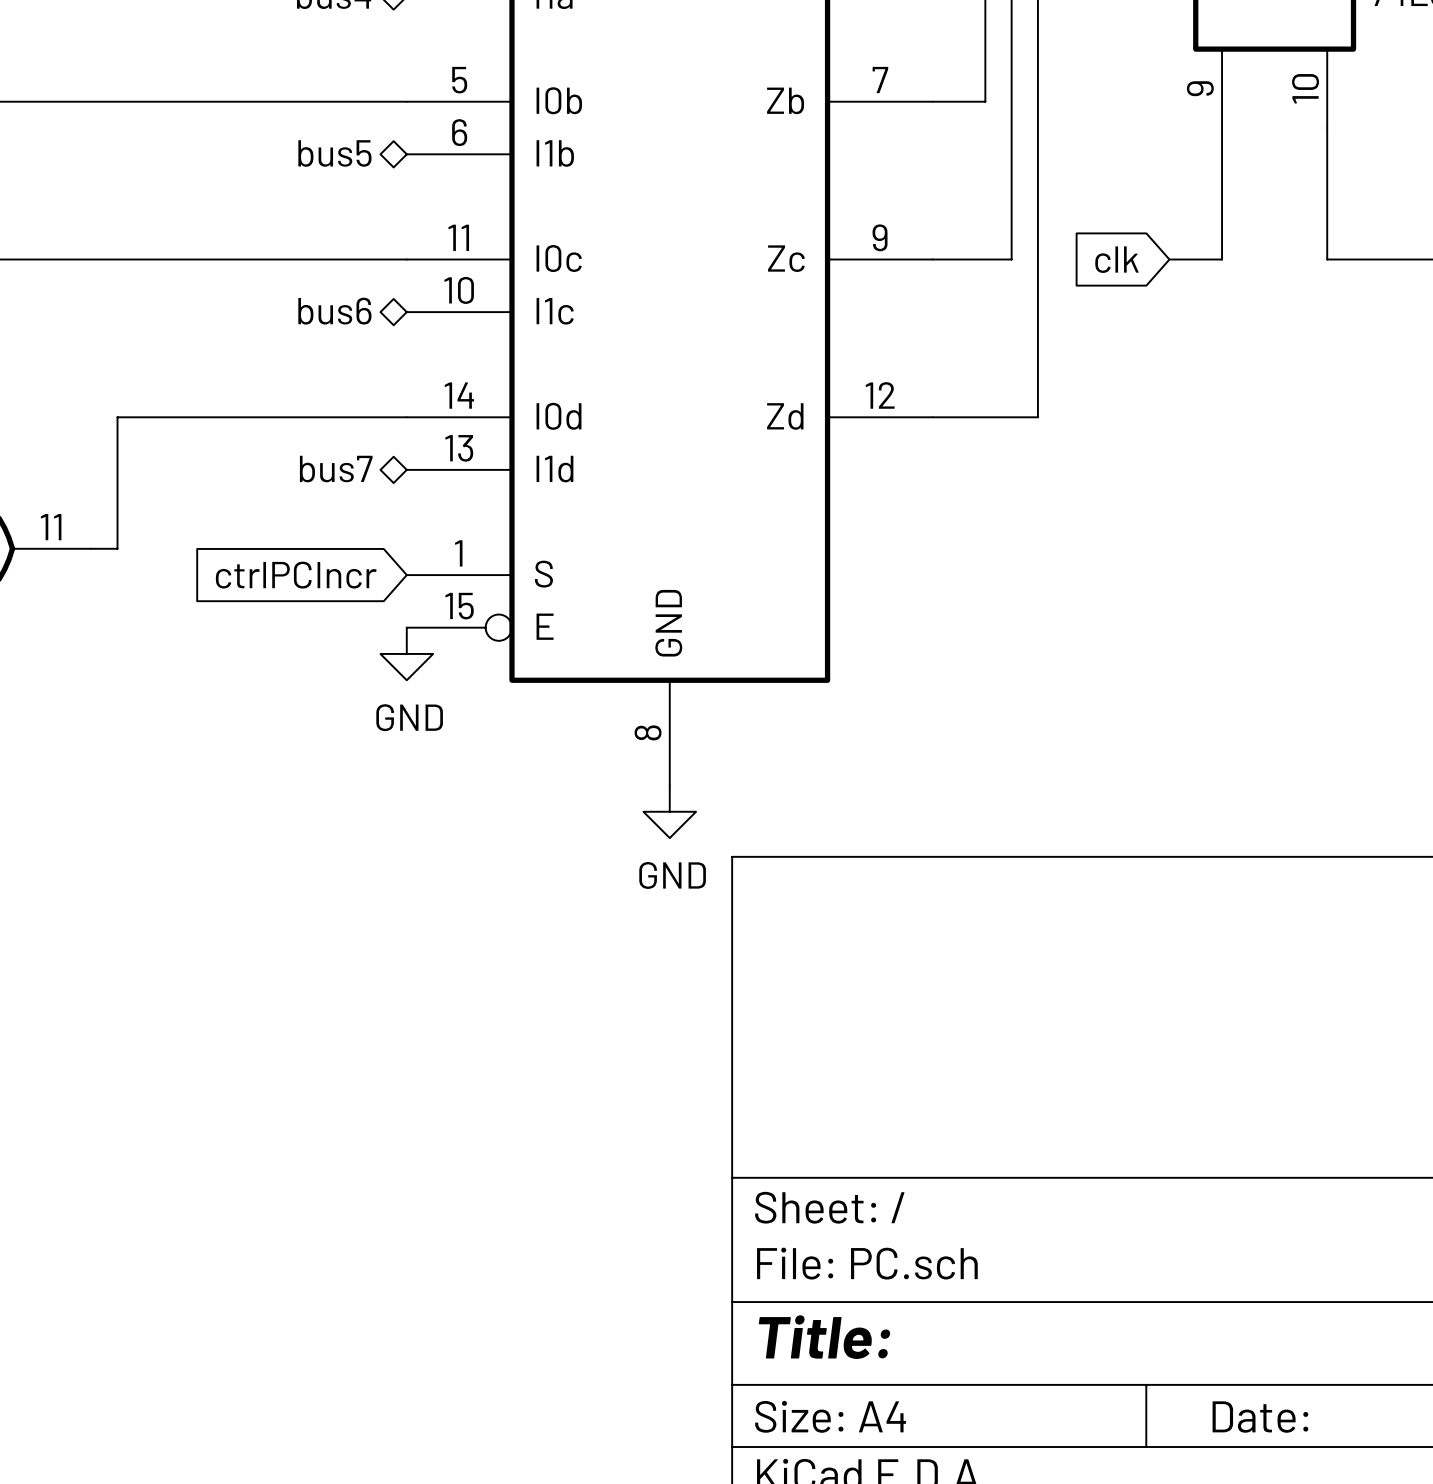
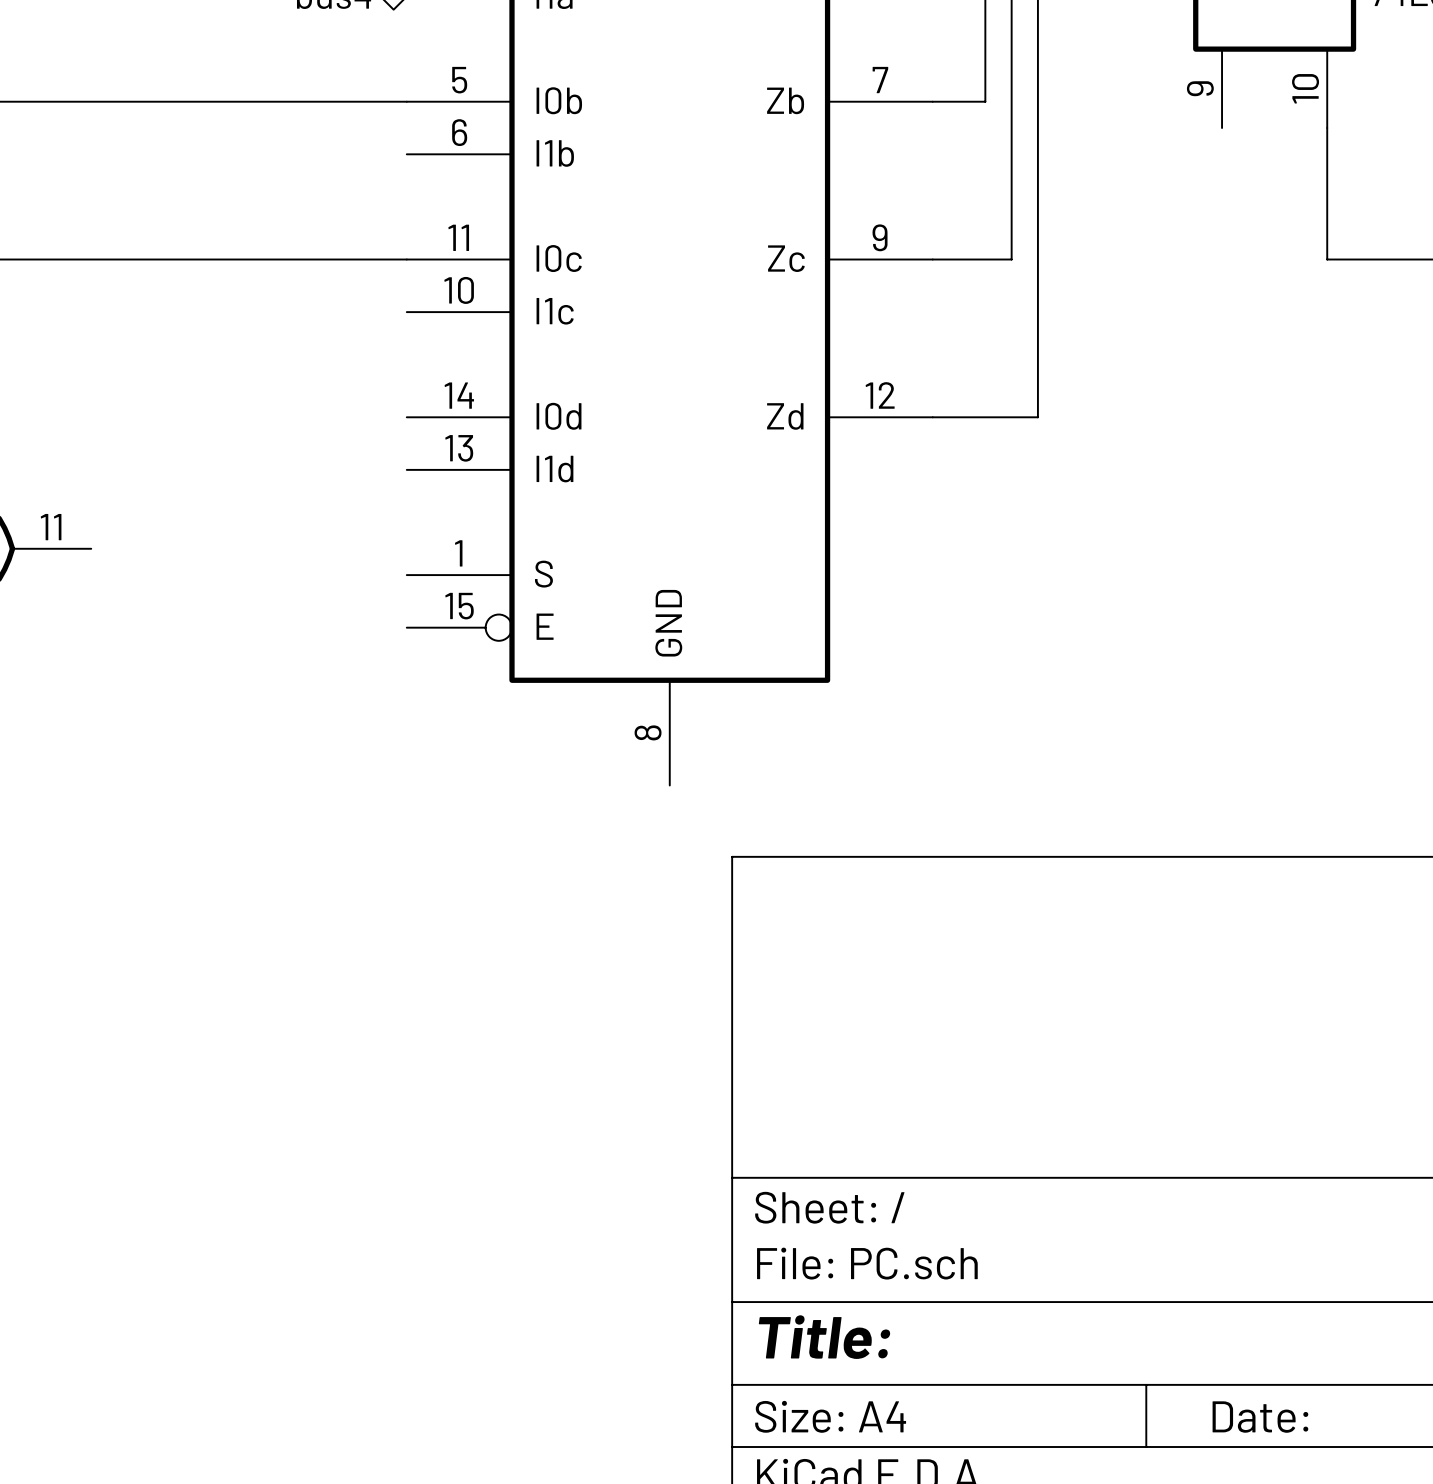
wire: (1222, 128) (1222, 259) (1169, 259) -> none
hierarchical label: bus5 (334, 153) -> none
global label: clk (1116, 259) -> none
hierarchical label: bus6 (334, 311) -> none
wire: (406, 417) (117, 417) (117, 548) (91, 548) -> none
hierarchical label: bus7 (336, 469) -> none
global label: ctrlPCIncr (296, 575) -> none
power symbol: GND (406, 653) -> none
power symbol: GND (669, 811) -> none

